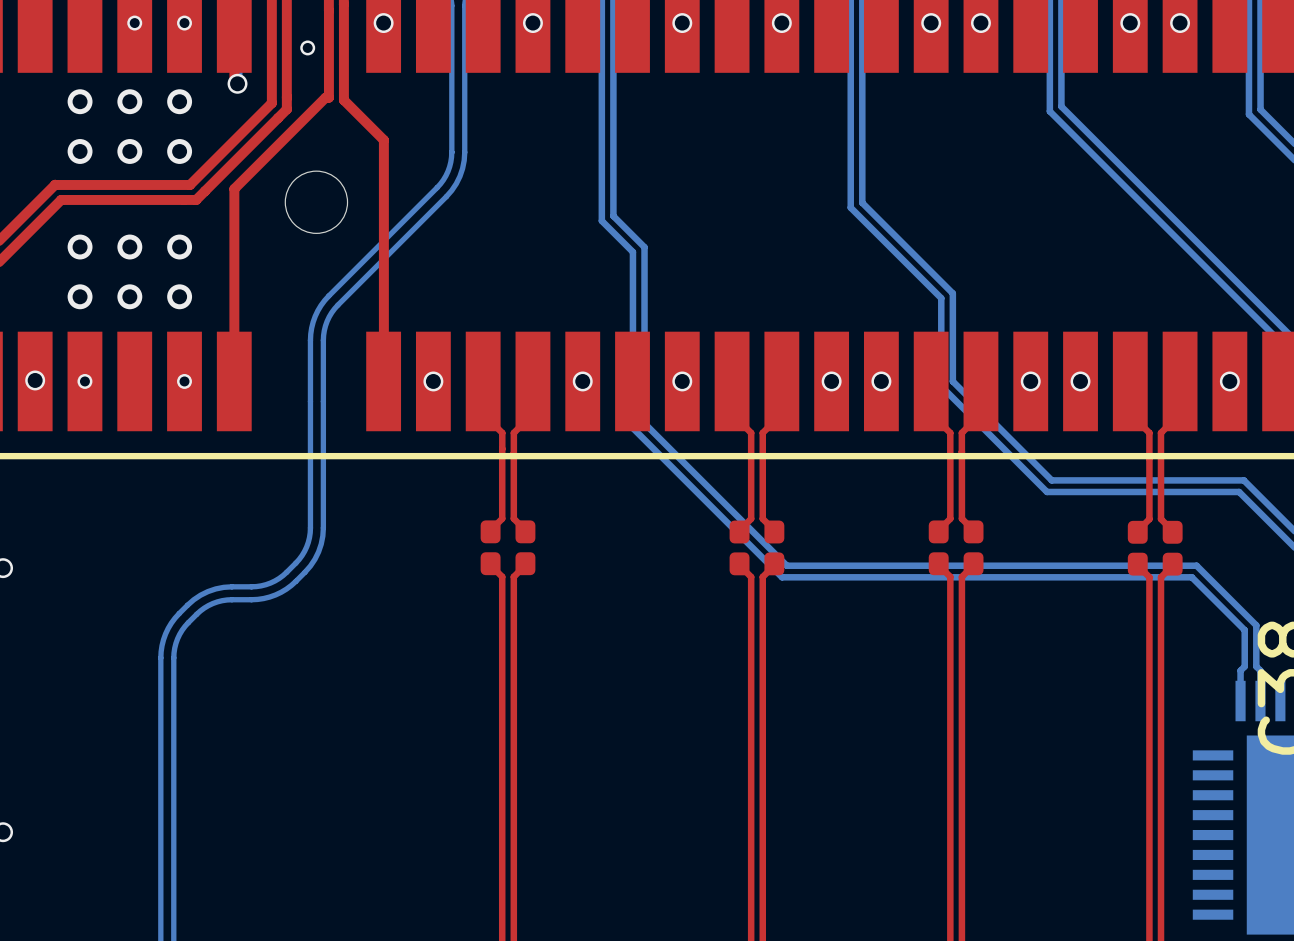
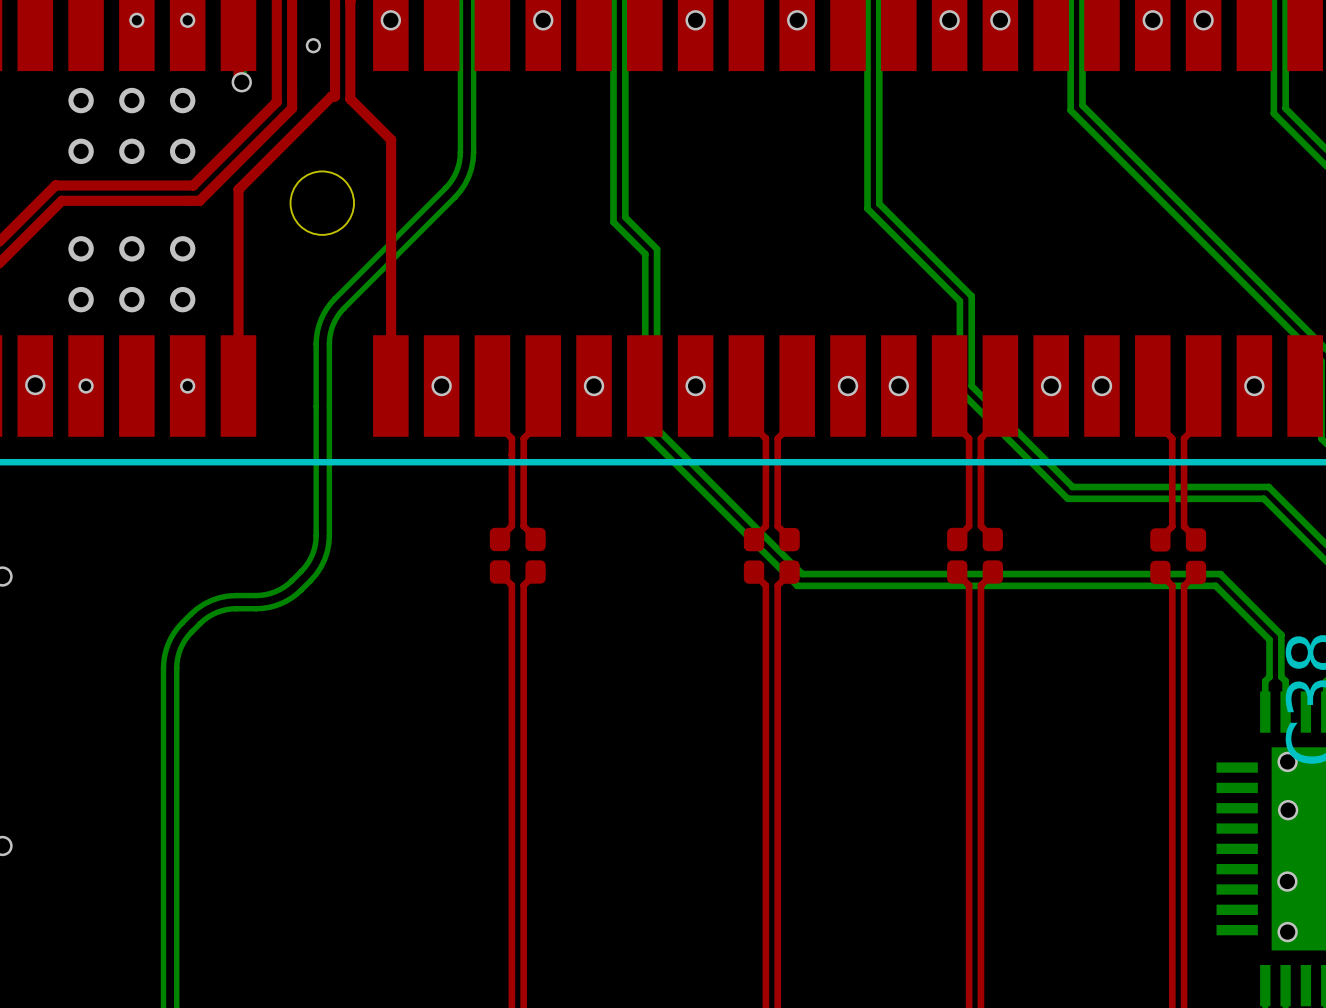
via: none -> (1287, 761)
via: none -> (1288, 810)
via: none -> (1287, 881)
via: none -> (1287, 932)

